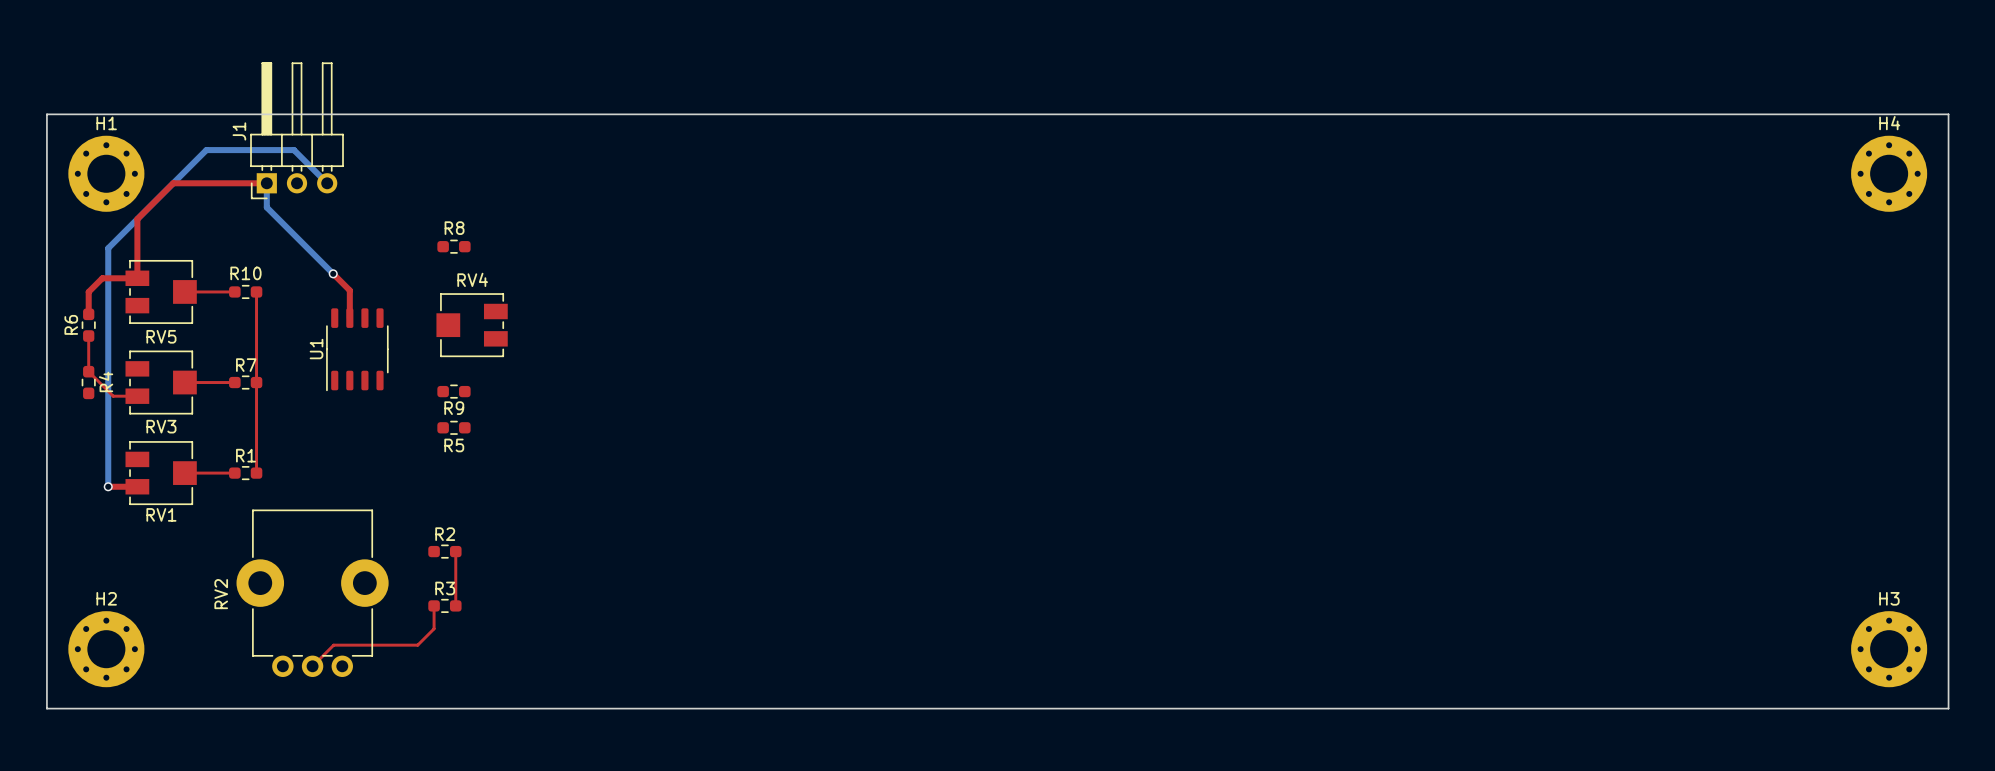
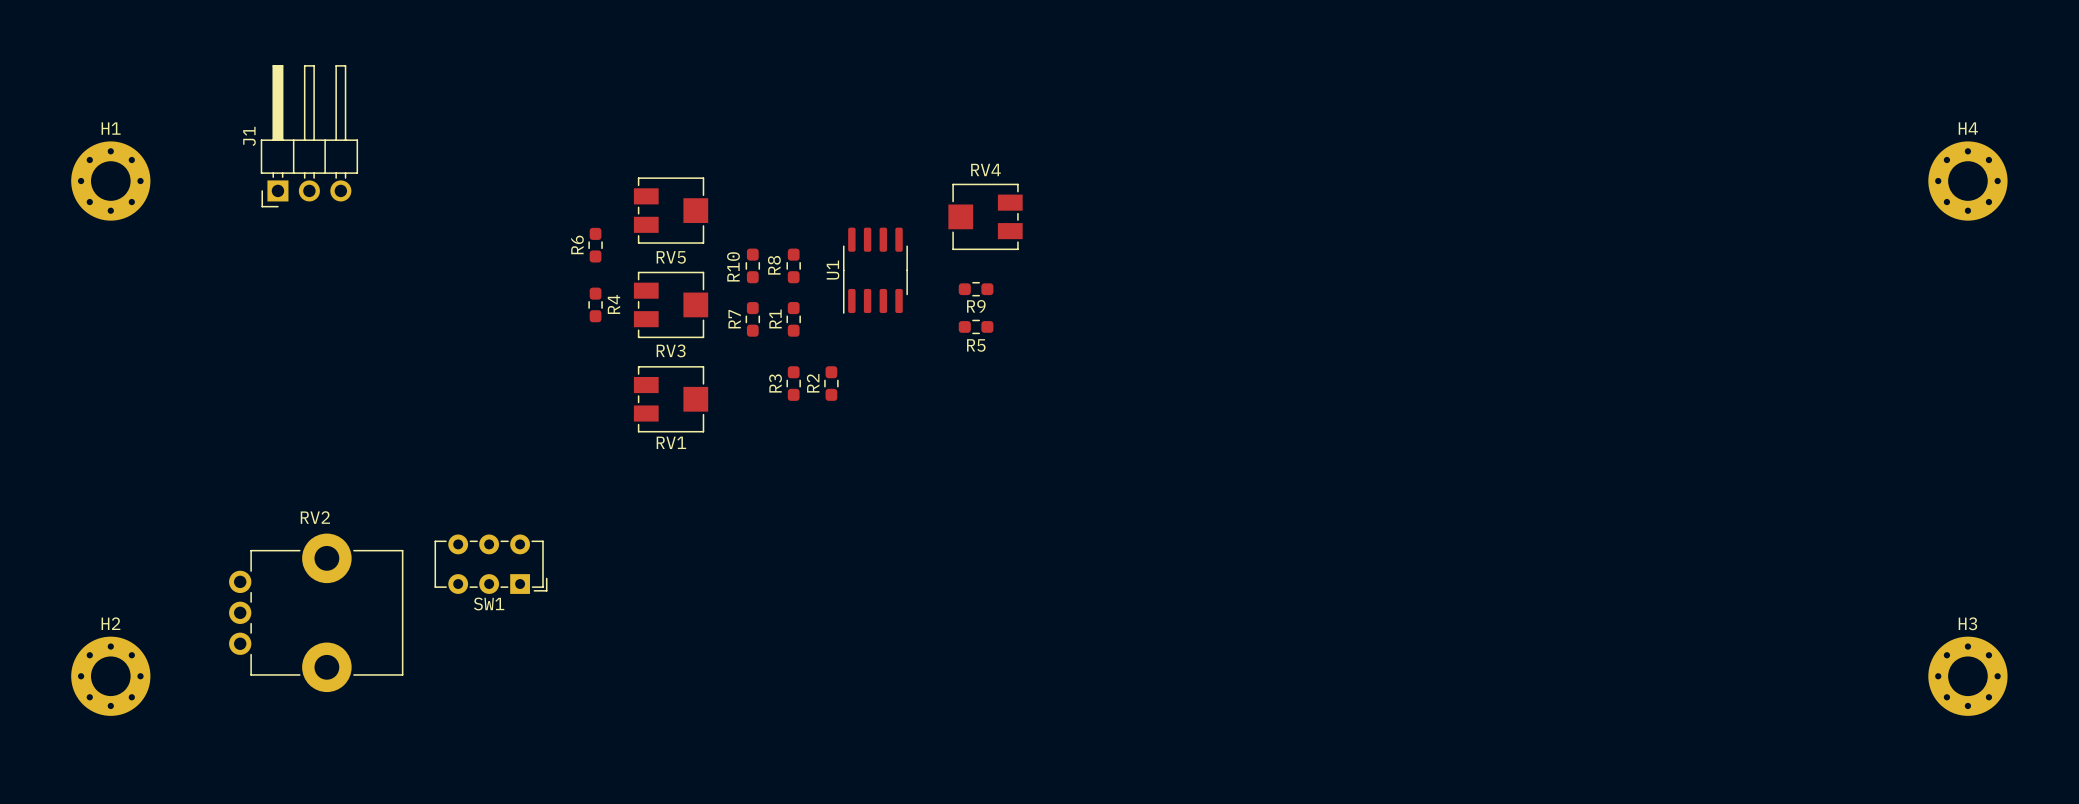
board edge: (46, 114) (1948, 114) (1948, 708) (46, 708) (46, 114) -> none
top track: (266, 183) (173, 183) (137, 219) (137, 278) (102, 278) (88, 291) (88, 314) -> none
bottom track: (266, 183) (266, 207) (333, 273) -> none
bottom track: (327, 183) (293, 150) (206, 150) (108, 248) (108, 486) -> none
R8 name position: R8 (454, 228) -> R8 (774, 265)
R8 rotation: 0° (453, 246) -> 90° clockwise (793, 265)
R8 position: (453, 246) -> (793, 265)
R10 name position: R10 (245, 273) -> R10 (733, 266)
top track: (333, 273) (349, 290) (349, 318) -> none
via: (333, 273) -> none
RV5 position: (161, 291) -> (671, 210)
top track: (184, 291) (234, 291) -> none
R10 rotation: 0° (245, 291) -> 90° clockwise (752, 265)
R10 position: (245, 291) -> (752, 265)
top track: (256, 291) (256, 473) -> none
U1 footprint: [326, 308, 389, 392] -> [843, 227, 908, 314]
R6 position: (88, 325) -> (595, 245)
RV4 position: (472, 325) -> (985, 216)
top track: (88, 336) (88, 371) (113, 396) (137, 396) -> none
R7 name position: R7 (246, 365) -> R7 (734, 319)
R4 position: (88, 382) -> (595, 304)
RV3 position: (161, 382) -> (671, 304)
top track: (184, 382) (234, 382) -> none
R7 rotation: 0° (245, 382) -> 90° clockwise (752, 319)
R7 position: (245, 382) -> (752, 319)
R9 position: (453, 391) -> (976, 289)
R5 position: (453, 427) -> (976, 326)
R1 name position: R1 (245, 455) -> R1 (775, 318)
RV1 position: (161, 473) -> (671, 399)
top track: (184, 473) (234, 473) -> none
R1 rotation: 0° (245, 473) -> 90° clockwise (793, 319)
R1 position: (245, 473) -> (793, 319)
top track: (108, 486) (137, 486) -> none
via: (108, 486) -> none
R2 name position: R2 (445, 534) -> R2 (813, 383)
SW1: none -> (491, 564)
R2 rotation: 0° (444, 551) -> 90° clockwise (831, 383)
R2 position: (444, 551) -> (831, 383)
top track: (455, 551) (455, 605) -> none
R3 name position: R3 (445, 588) -> R3 (775, 383)
RV2 rotation: 0° (312, 593) -> 90° clockwise (316, 612)
top track: (434, 605) (434, 628) (417, 645) (333, 645) (312, 666) -> none
R3 rotation: 0° (444, 605) -> 90° clockwise (793, 383)
R3 position: (444, 605) -> (793, 383)

